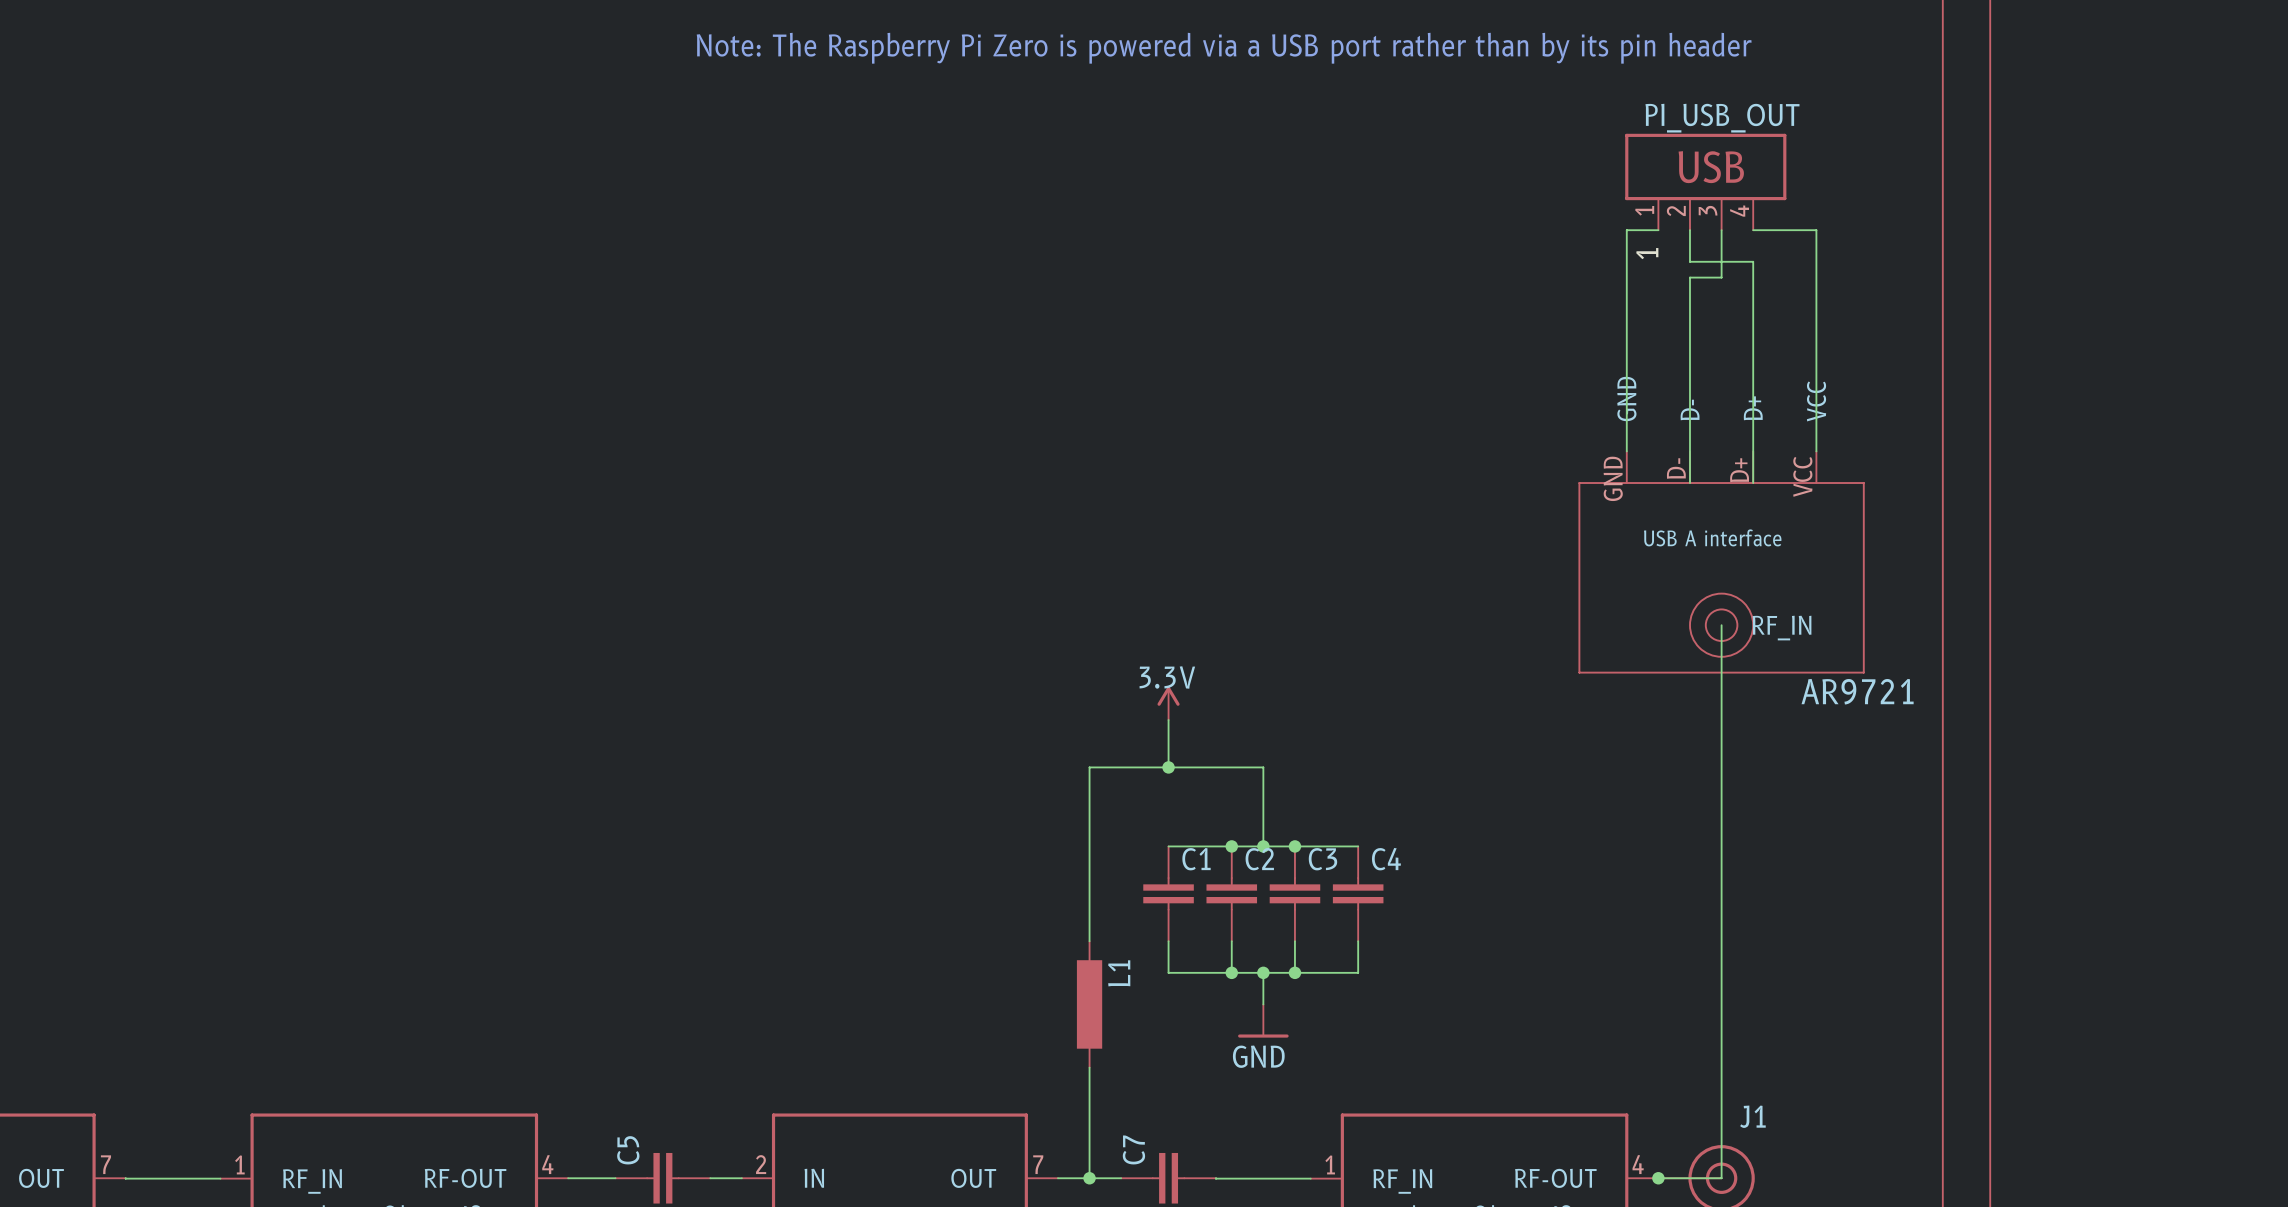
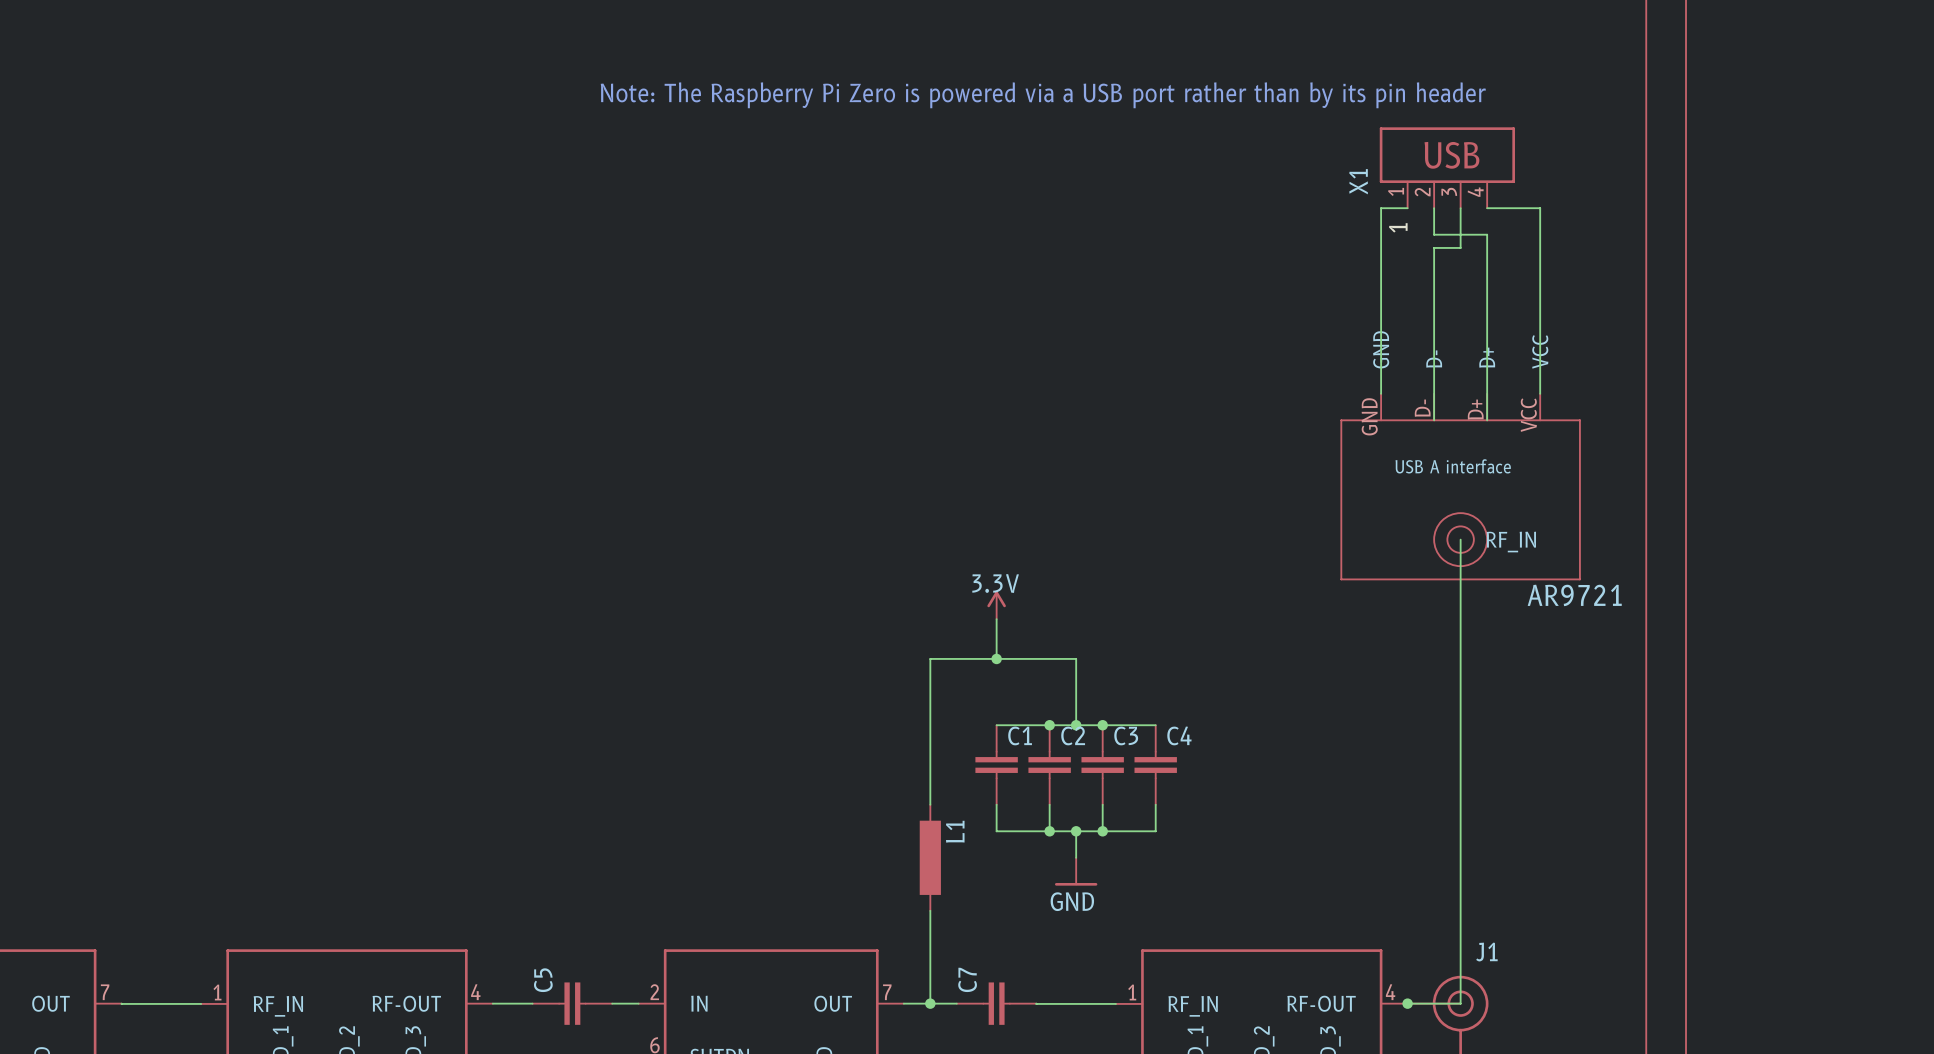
text position: Note: The Raspberry Pi Zero is powered via a USB port rather than by its pin header (1224, 48) -> Note: The Raspberry Pi Zero is powered via a USB port rather than by its pin header (1043, 95)
PI_USB_OUT name: PI_USB_OUT (1722, 118) -> X1 (1358, 181)

